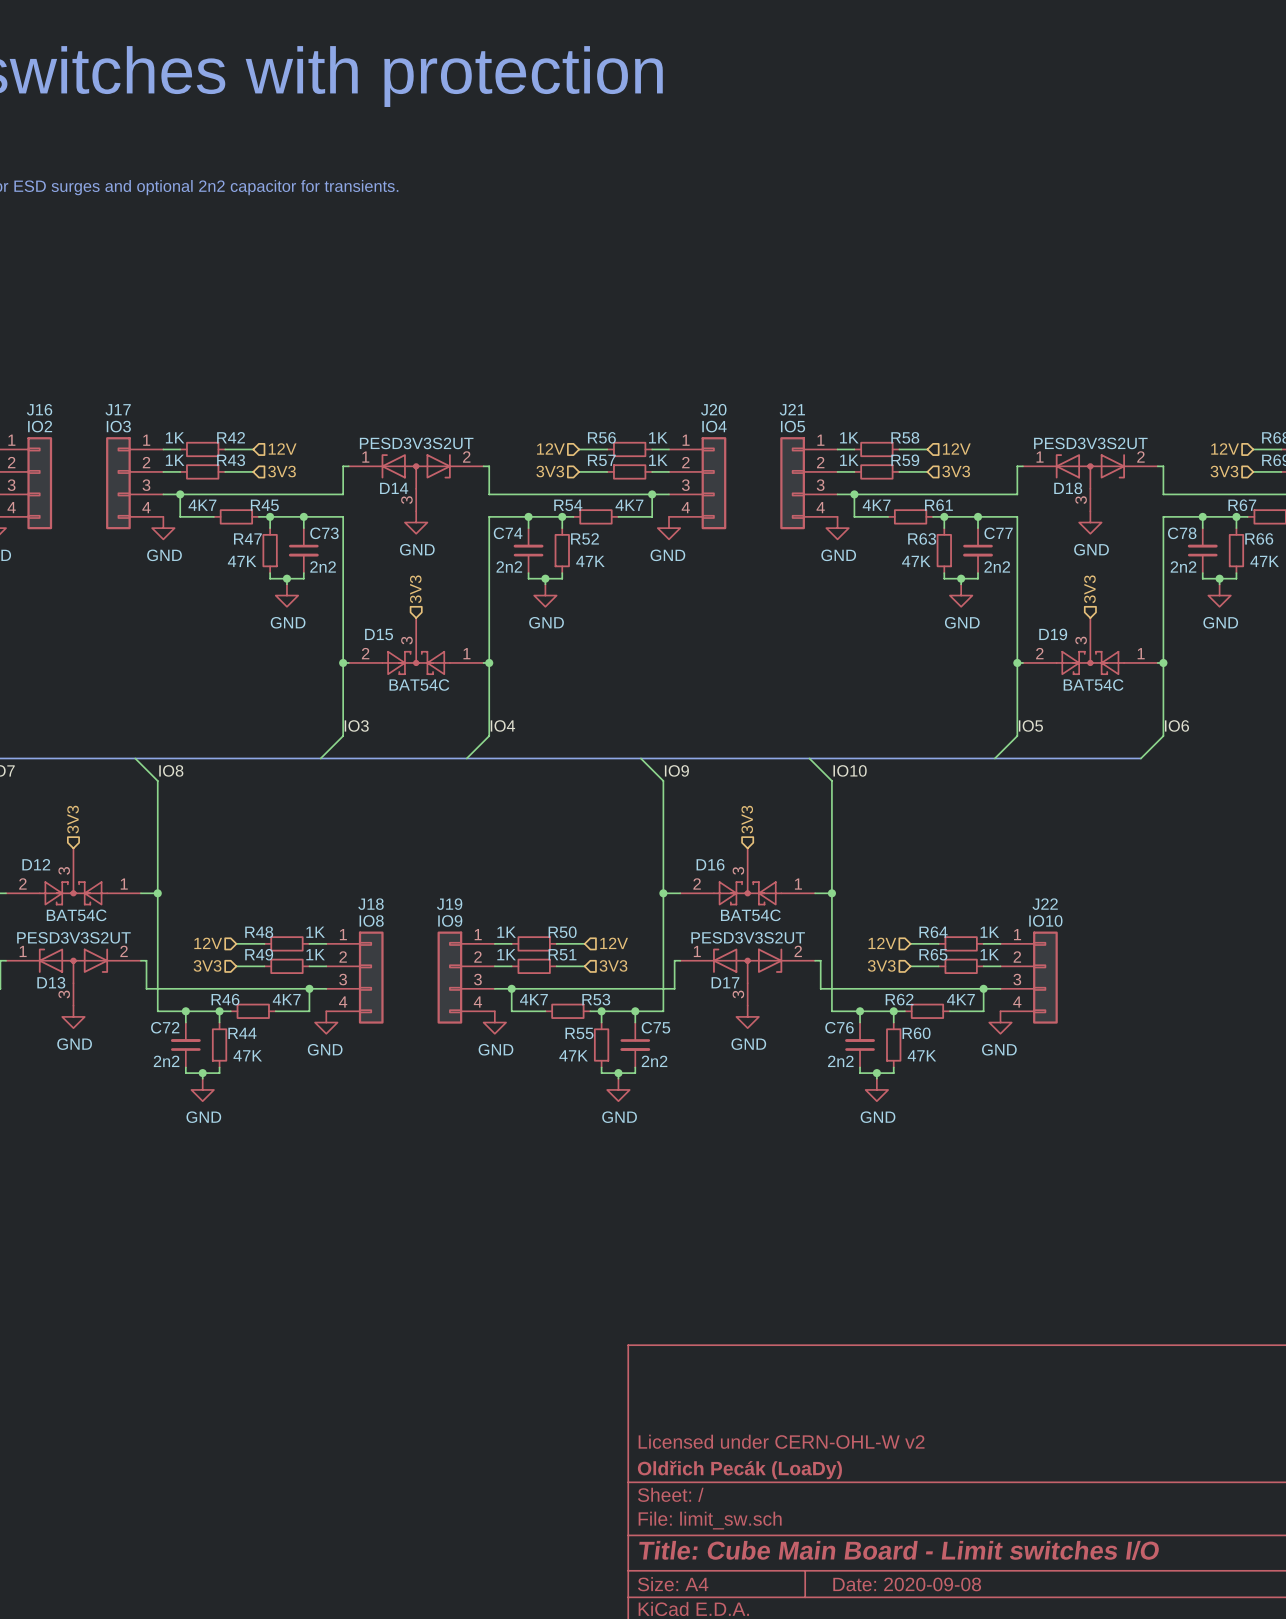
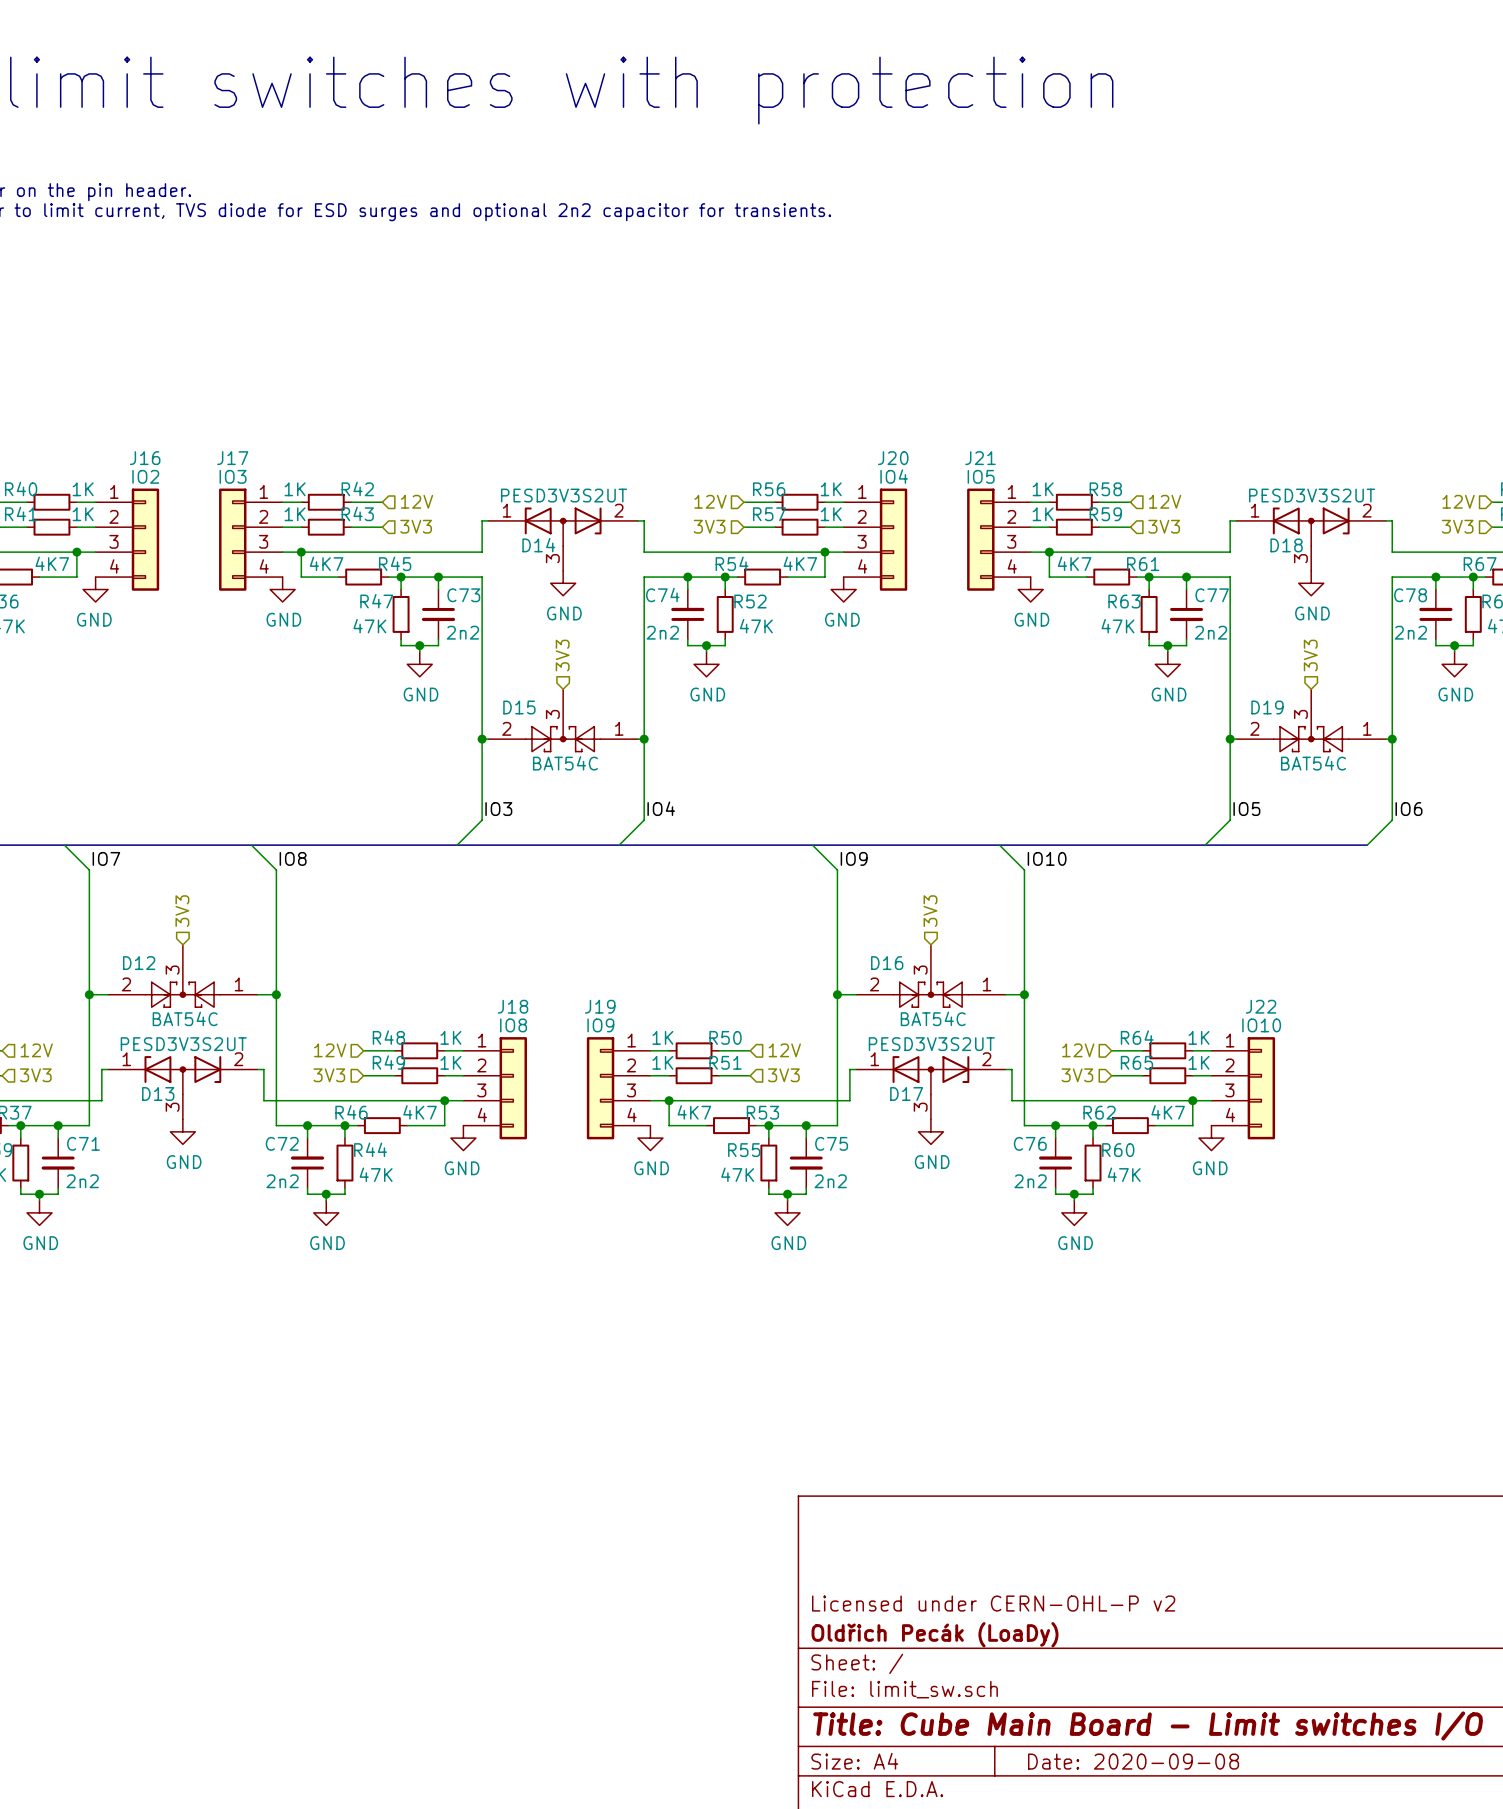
title block: Licensed under CERN-OHL-W v2 (781, 1441) -> Licensed under CERN-OHL-P v2 (993, 1603)

